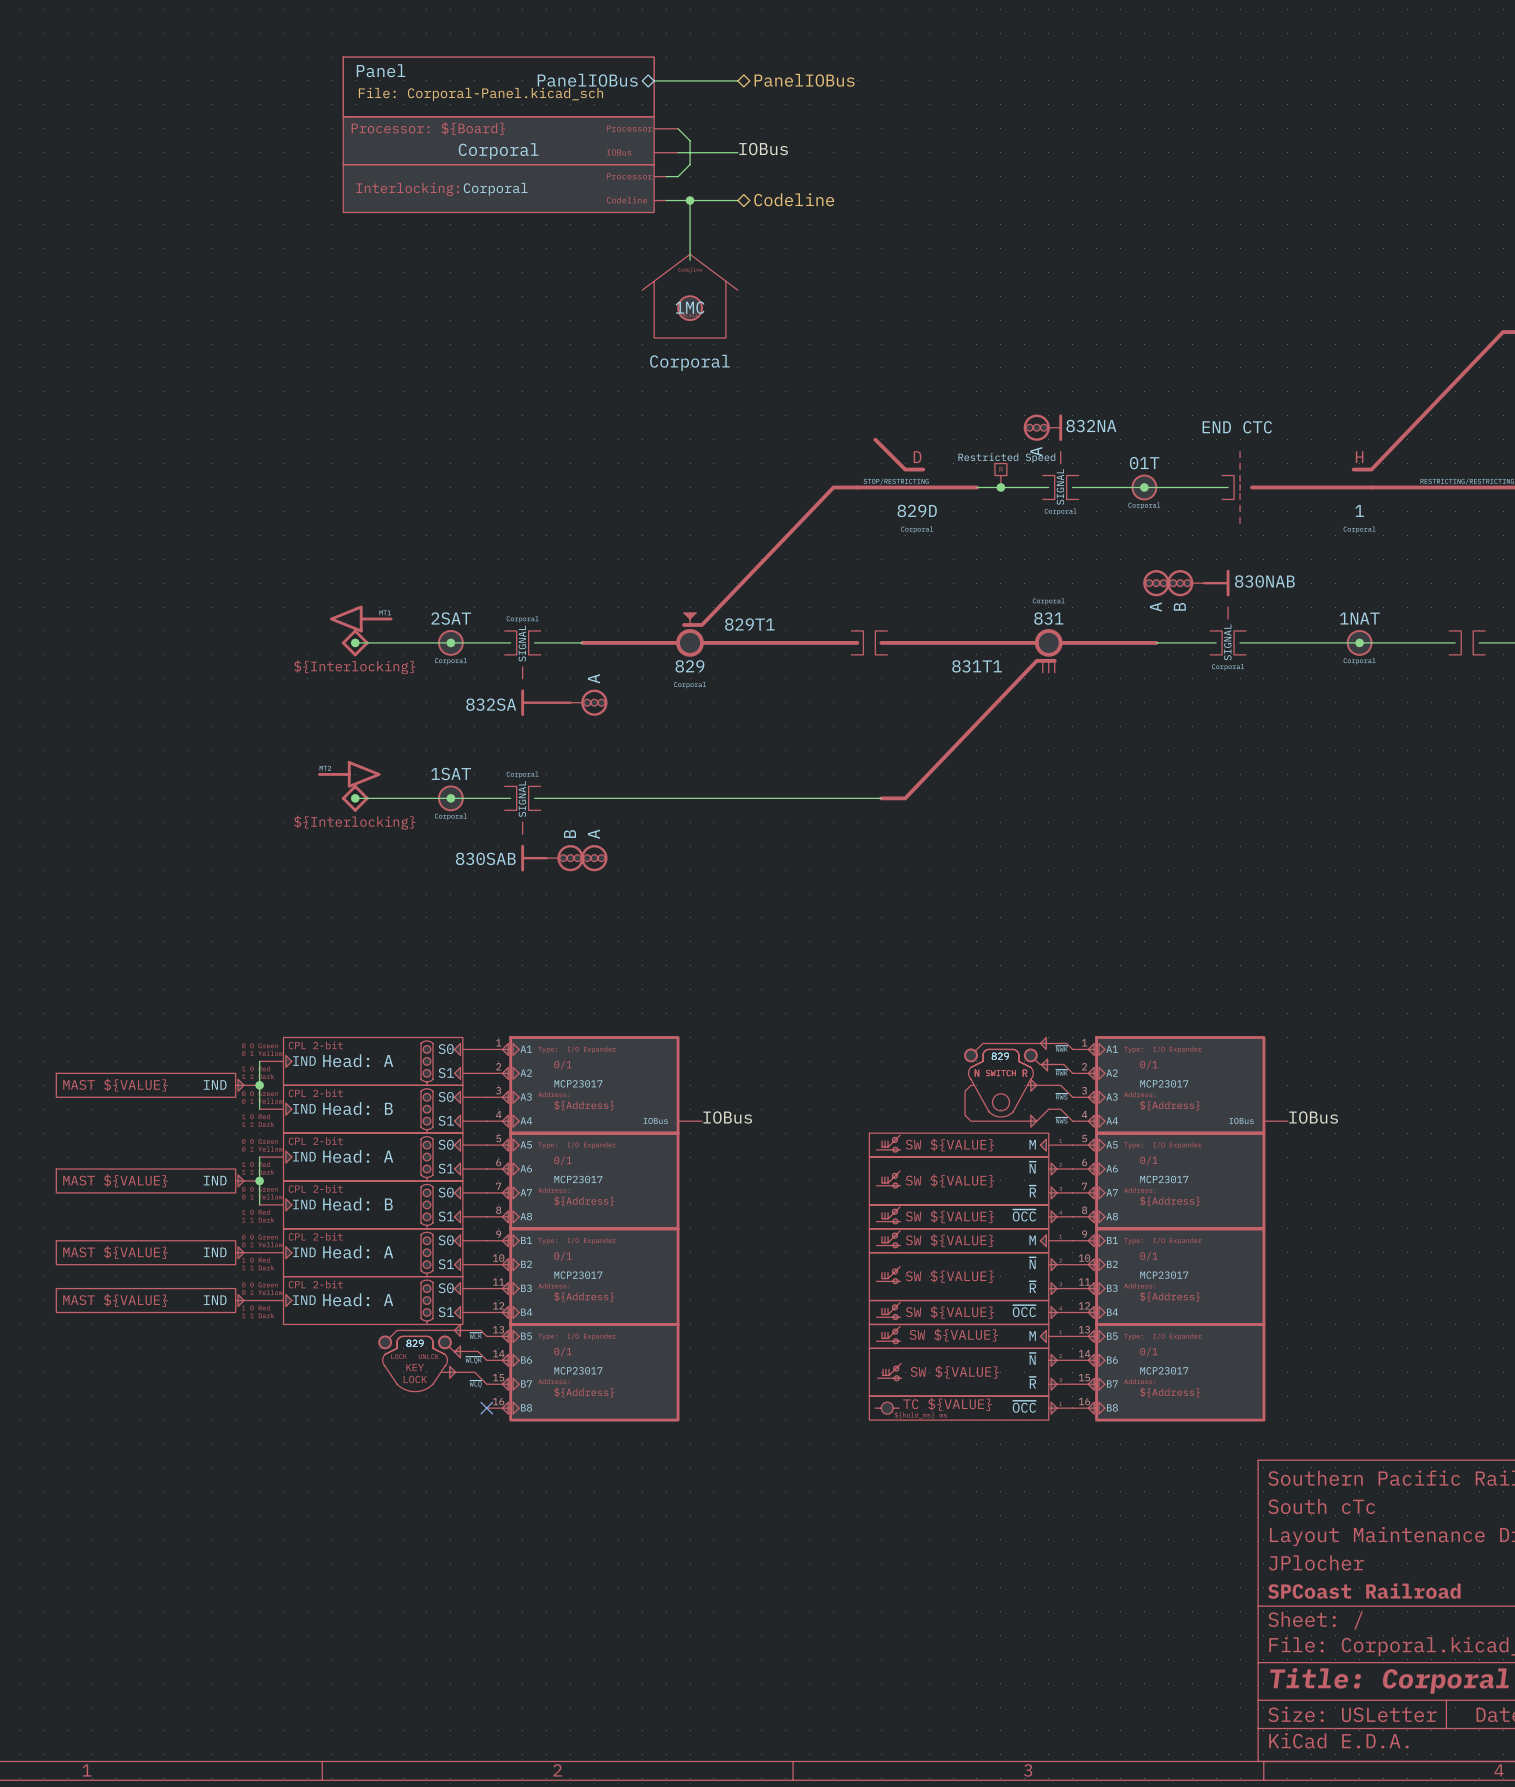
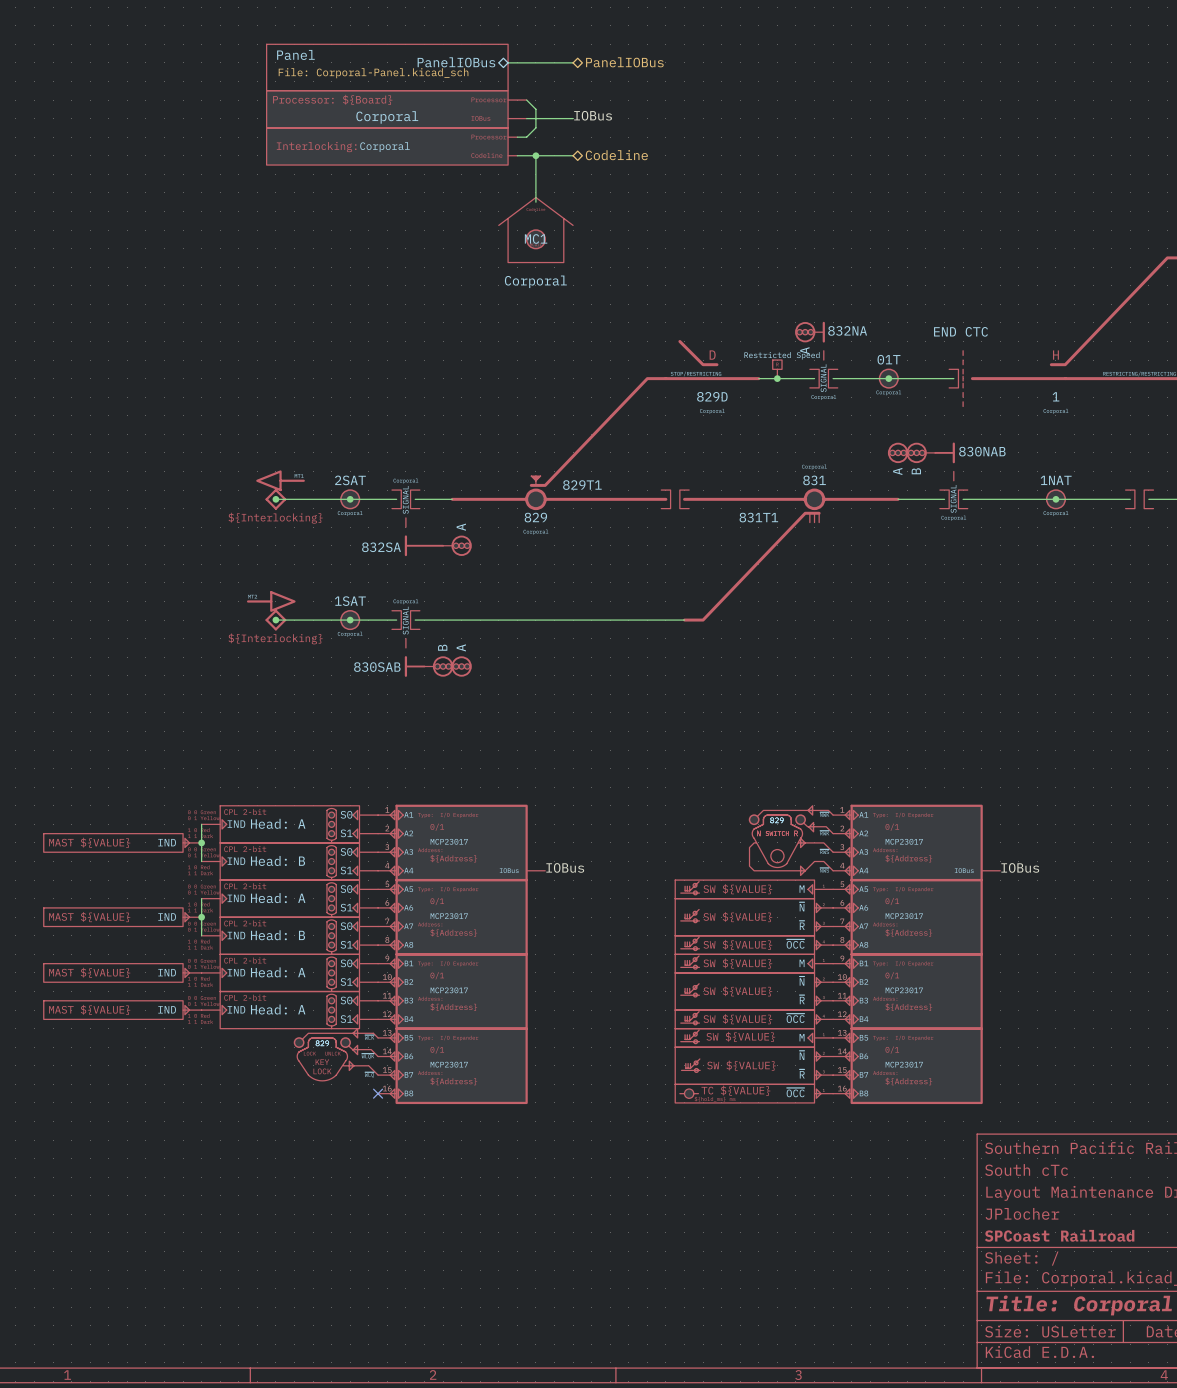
part text: 1MC (689, 307) -> none
part value: none -> MC1 (536, 238)

